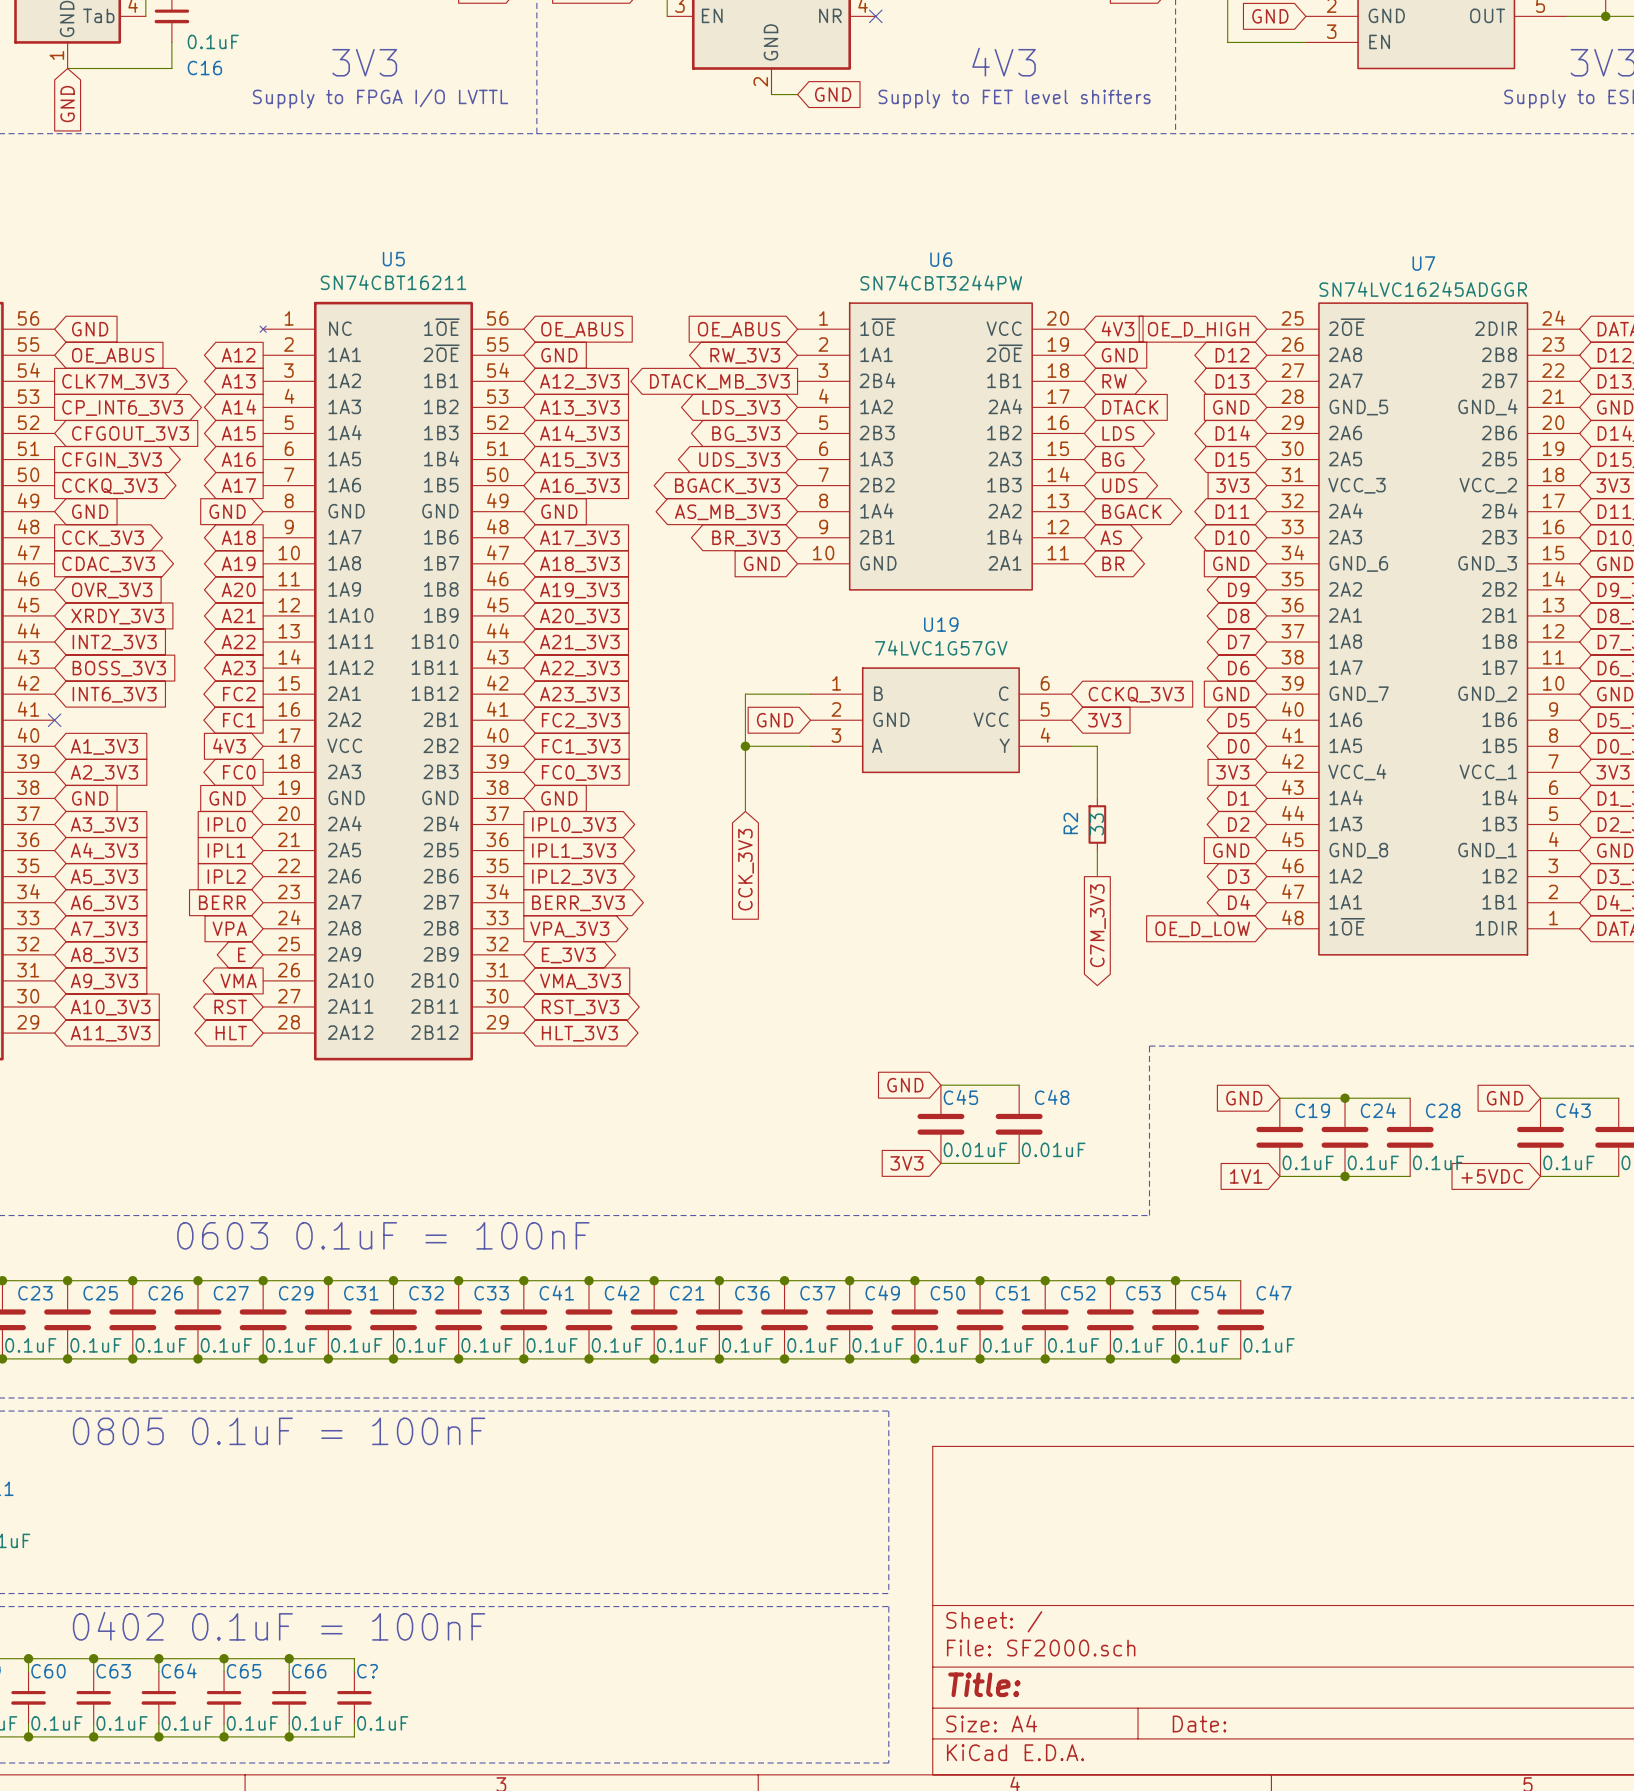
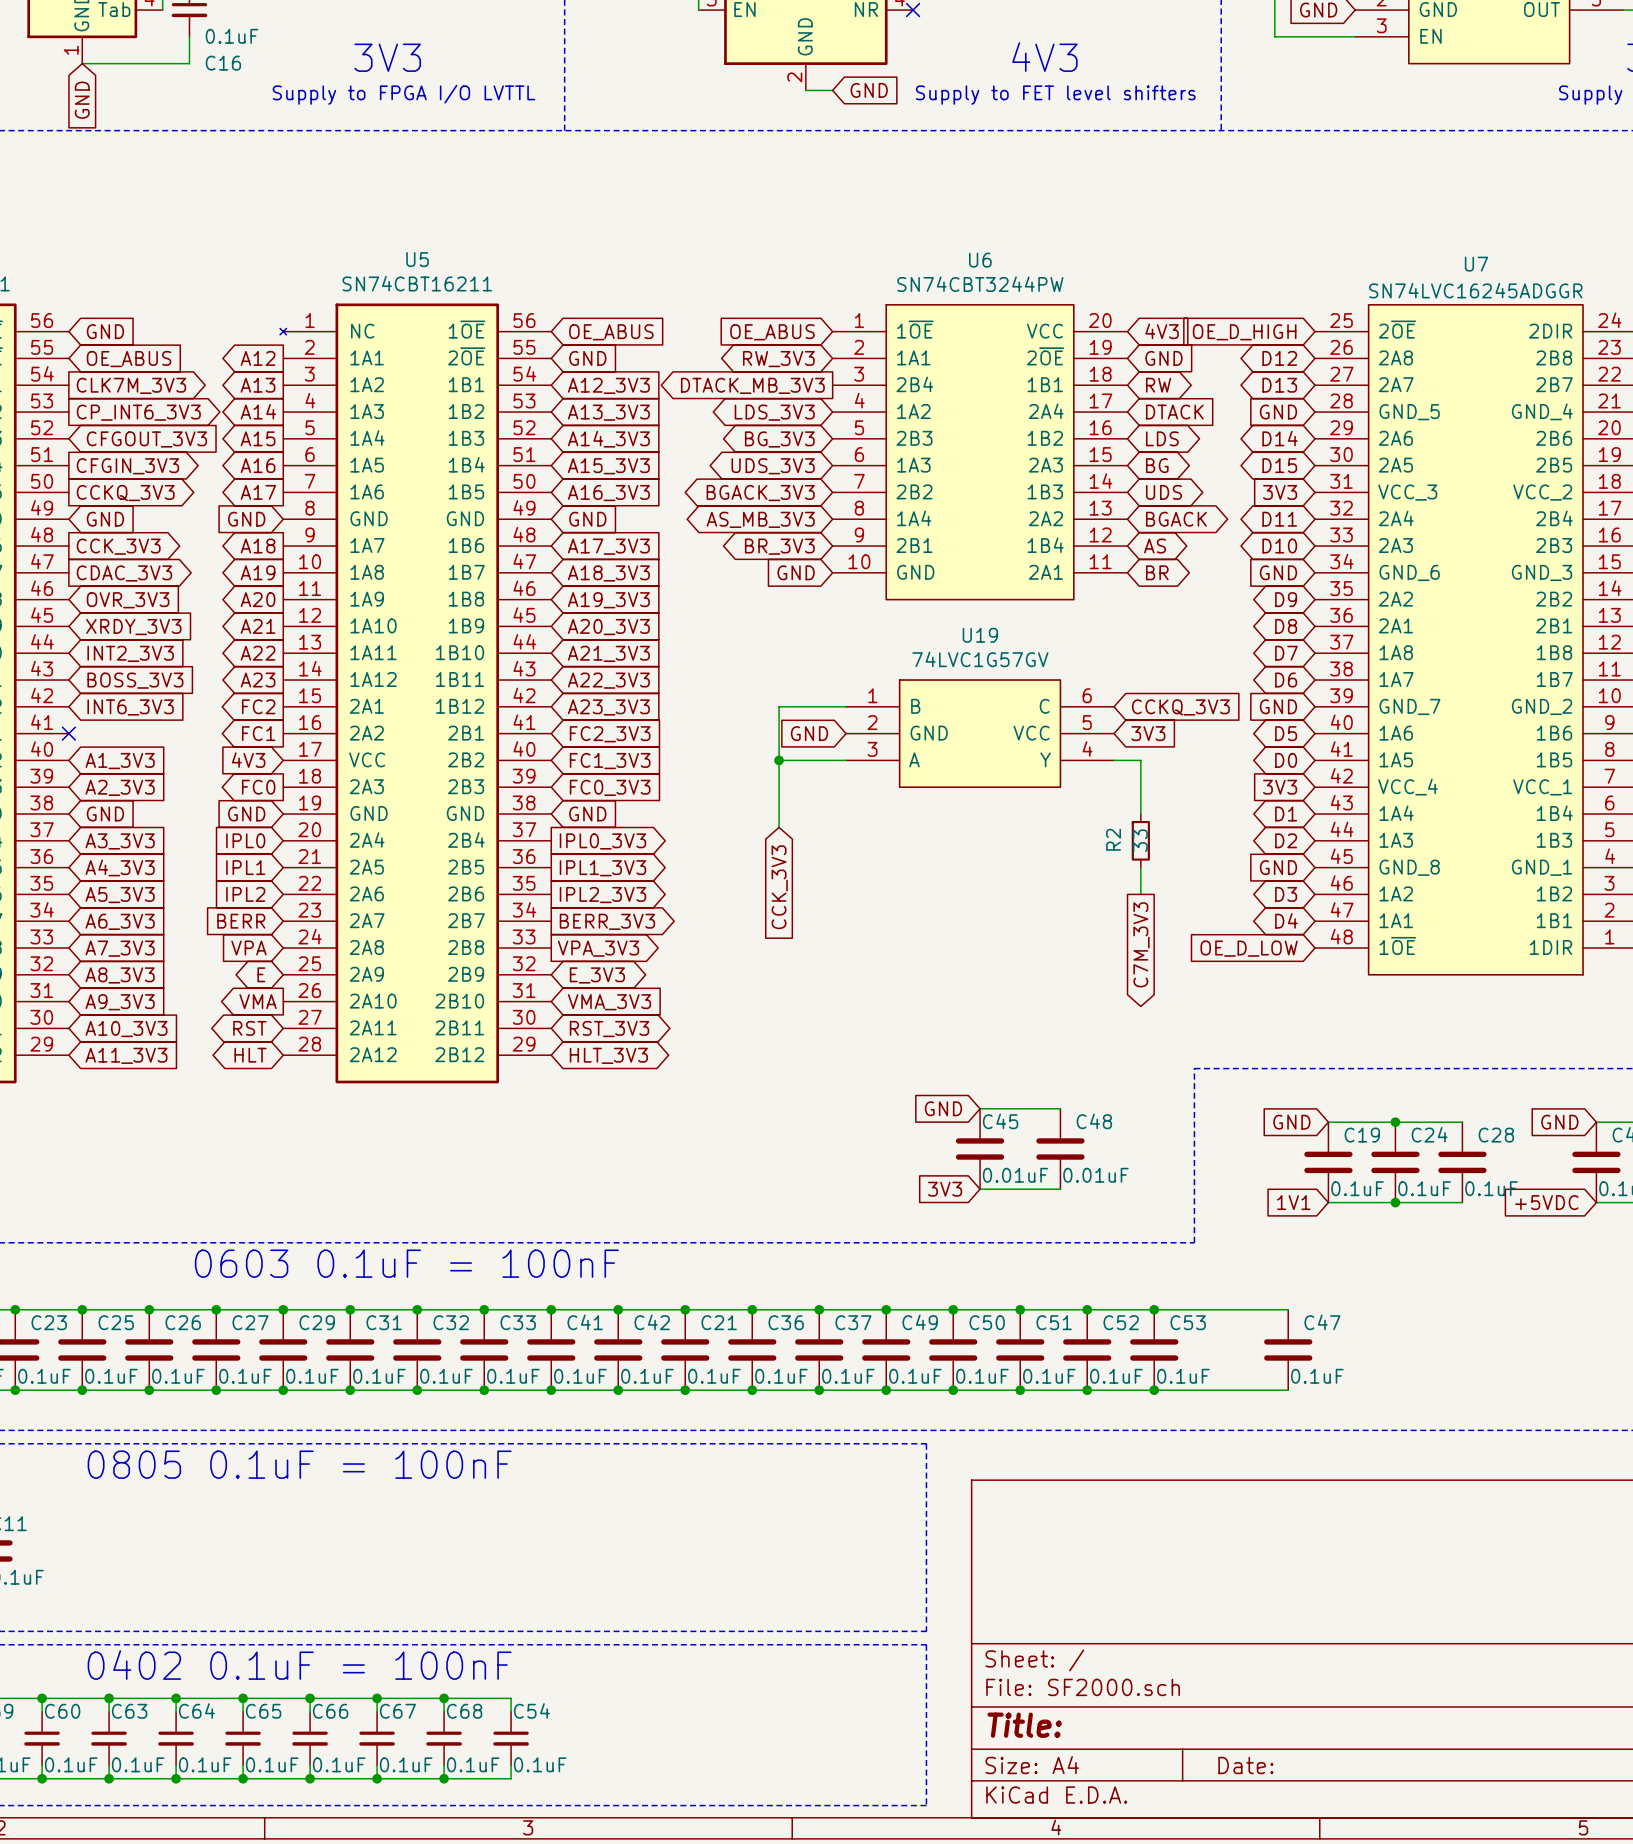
C54 symbol: [1152, 1280, 1200, 1359] -> [493, 1711, 529, 1766]
junction: (1175, 1280) -> none
junction: (1175, 1358) -> none
wire: none -> (377, 1698) (511, 1698) (511, 1711)
junction: none -> (377, 1698)
wire: none -> (444, 1698) (444, 1711)
junction: none -> (444, 1698)
C? name: C? (367, 1671) -> C67 (397, 1711)
C68: none -> 0.1uF (444, 1738)
wire: none -> (444, 1765) (444, 1778)
wire: none -> (511, 1765) (511, 1778) (377, 1778)
junction: none -> (377, 1778)
junction: none -> (444, 1778)

